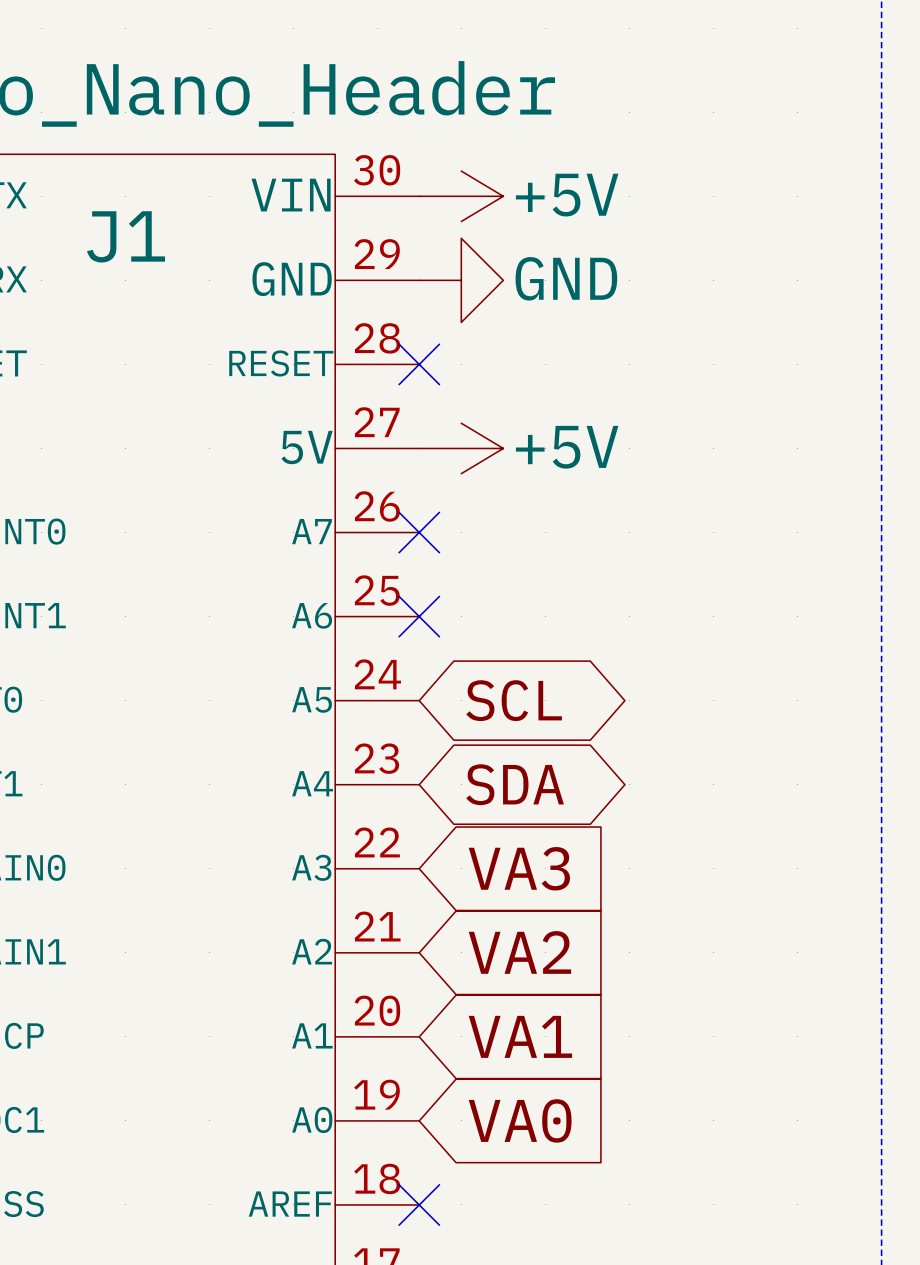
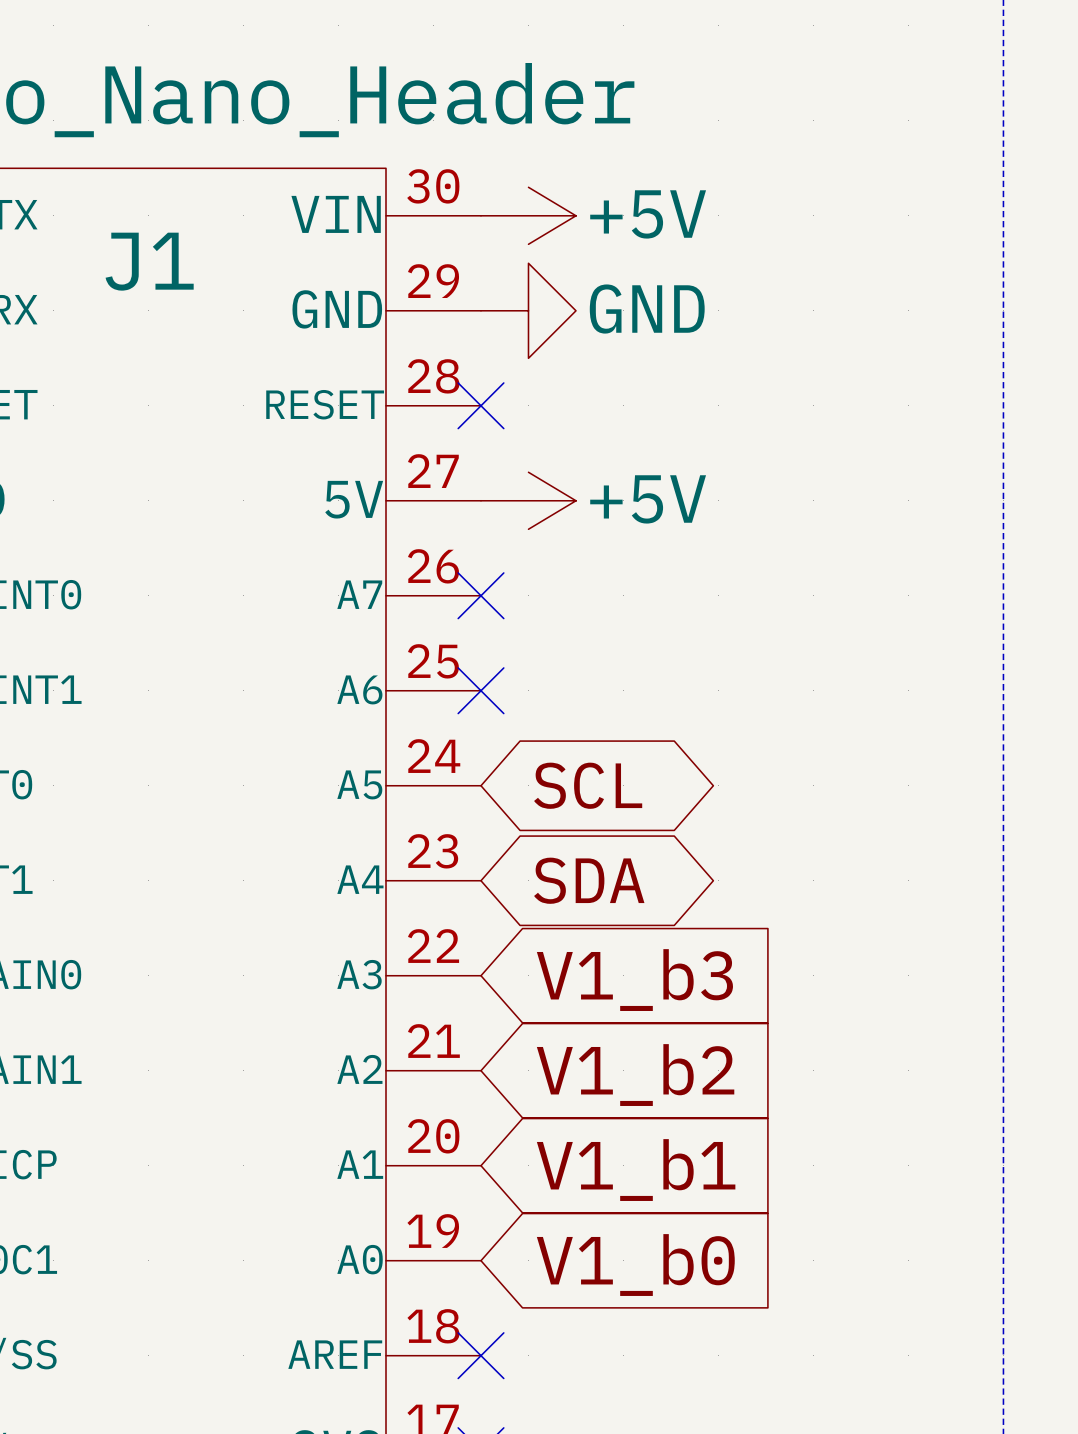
global label: VA3 (519, 868) -> V1_b3 (634, 980)
global label: VA2 (519, 952) -> V1_b2 (635, 1075)
global label: VA1 (520, 1036) -> V1_b1 (636, 1170)
global label: VA0 (520, 1120) -> V1_b0 (635, 1265)

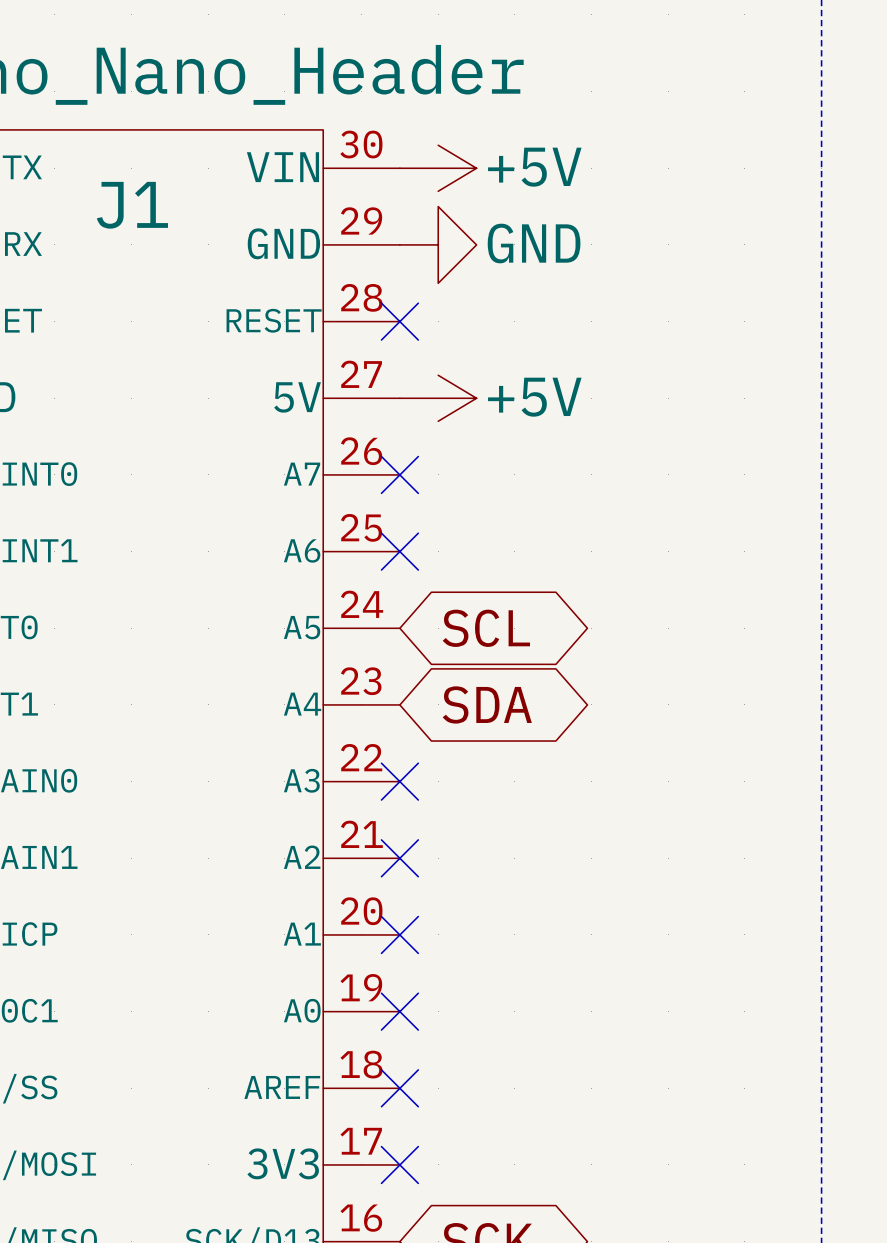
no-connect mark: none -> (399, 781)
global label: V1_b3 (634, 980) -> none
no-connect mark: none -> (399, 858)
global label: V1_b2 (635, 1075) -> none
no-connect mark: none -> (399, 934)
global label: V1_b1 (636, 1170) -> none
no-connect mark: none -> (399, 1011)
global label: V1_b0 (635, 1265) -> none

